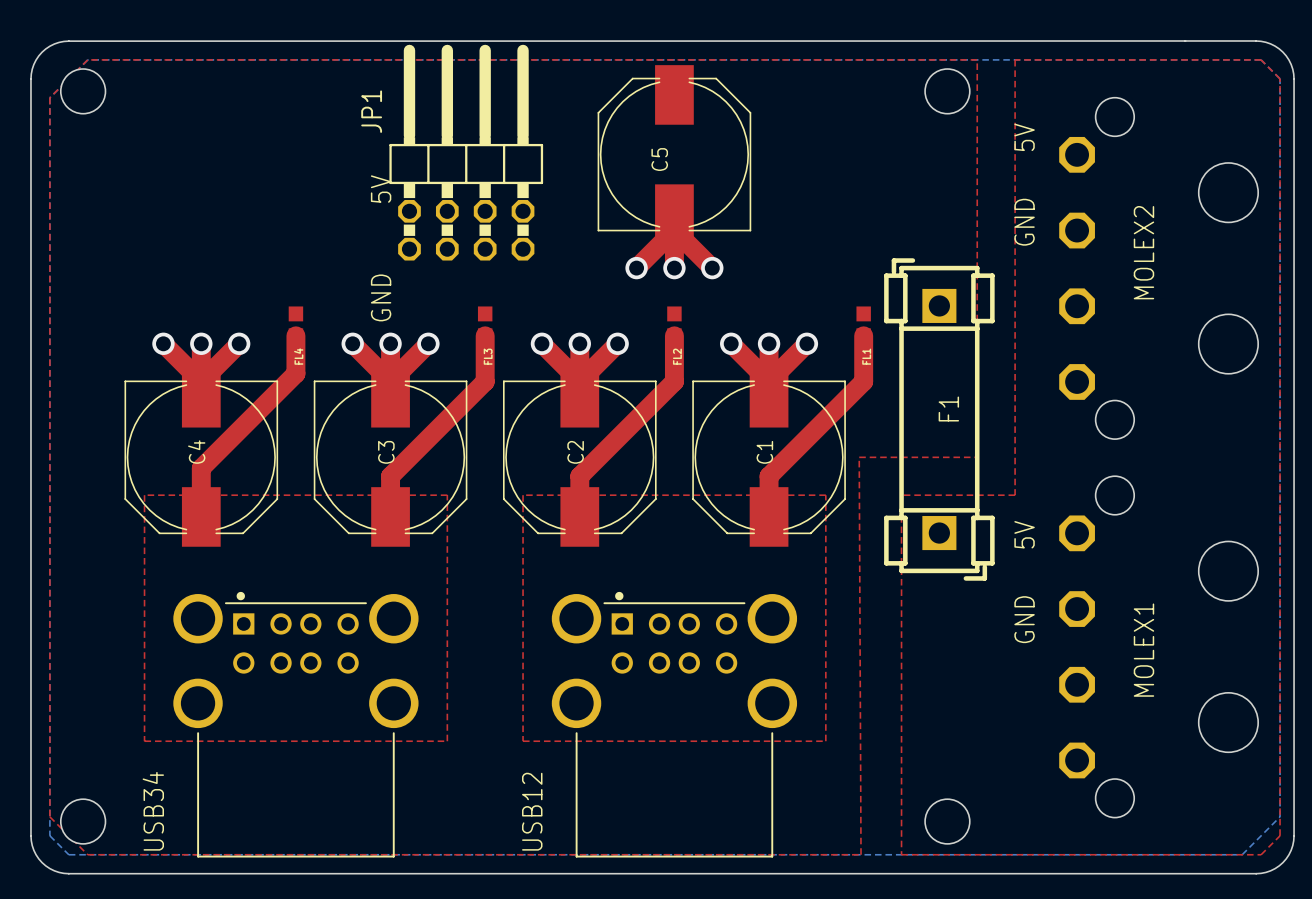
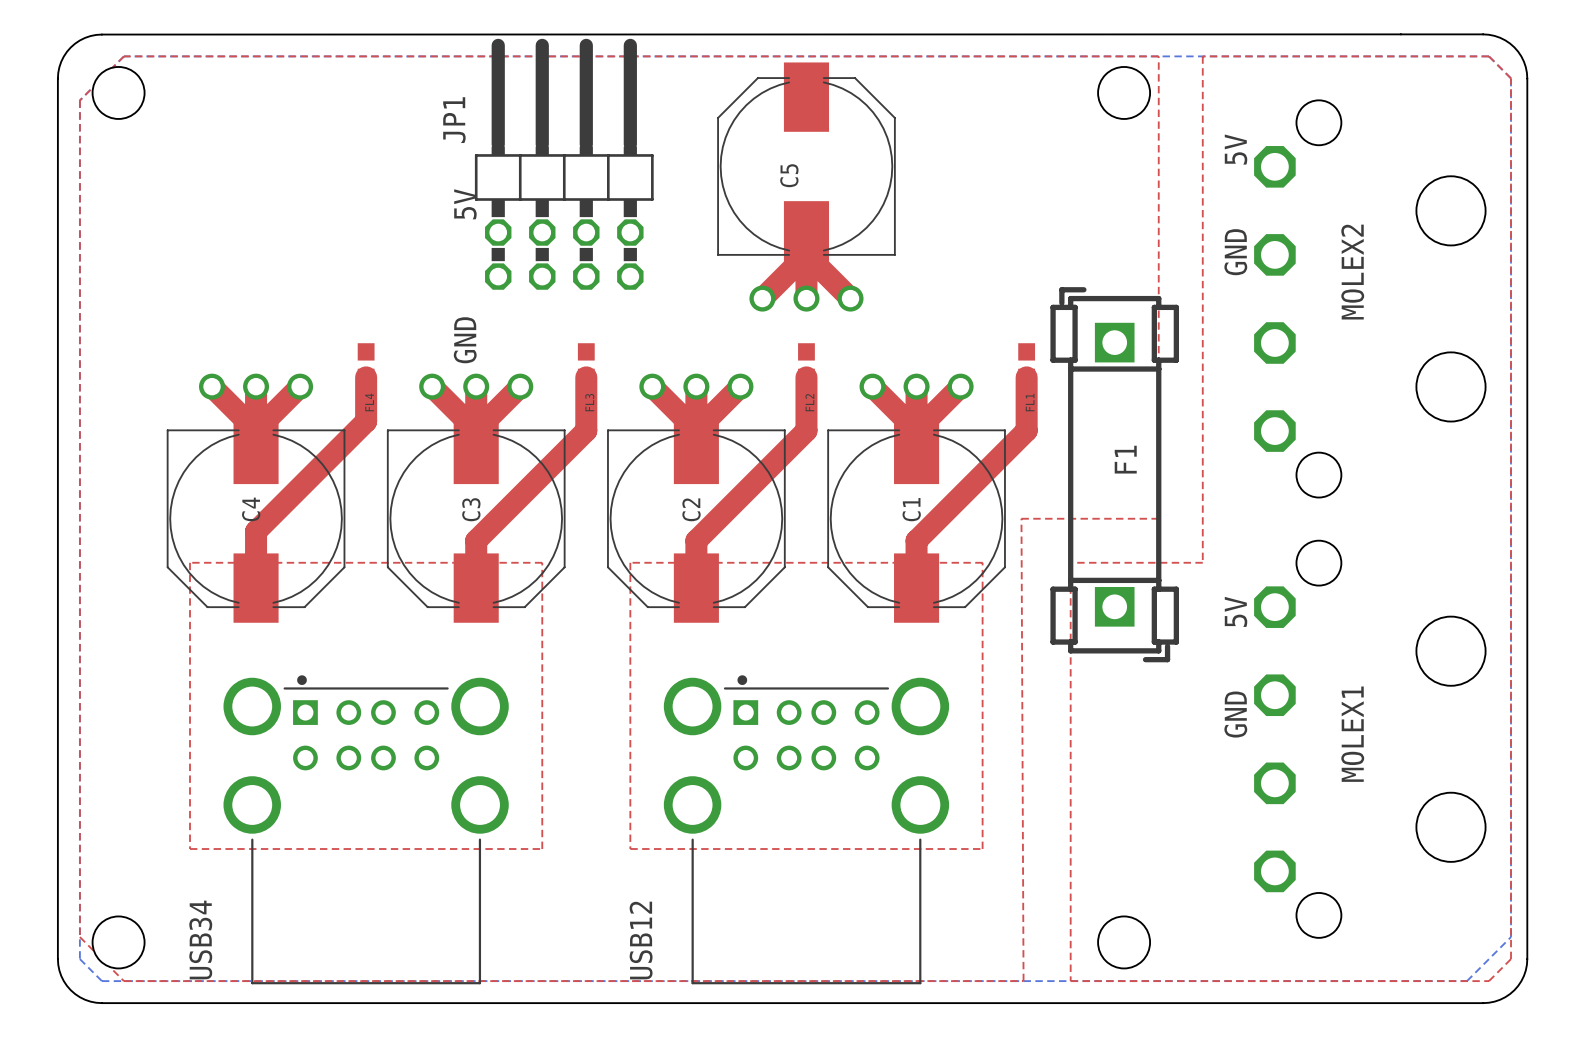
text position: 5V (1024, 137) -> 5V (1236, 149)
text position: GND (1024, 222) -> GND (1235, 252)
text position: 5V (1024, 534) -> 5V (1236, 611)
text position: GND (1024, 619) -> GND (1235, 714)

